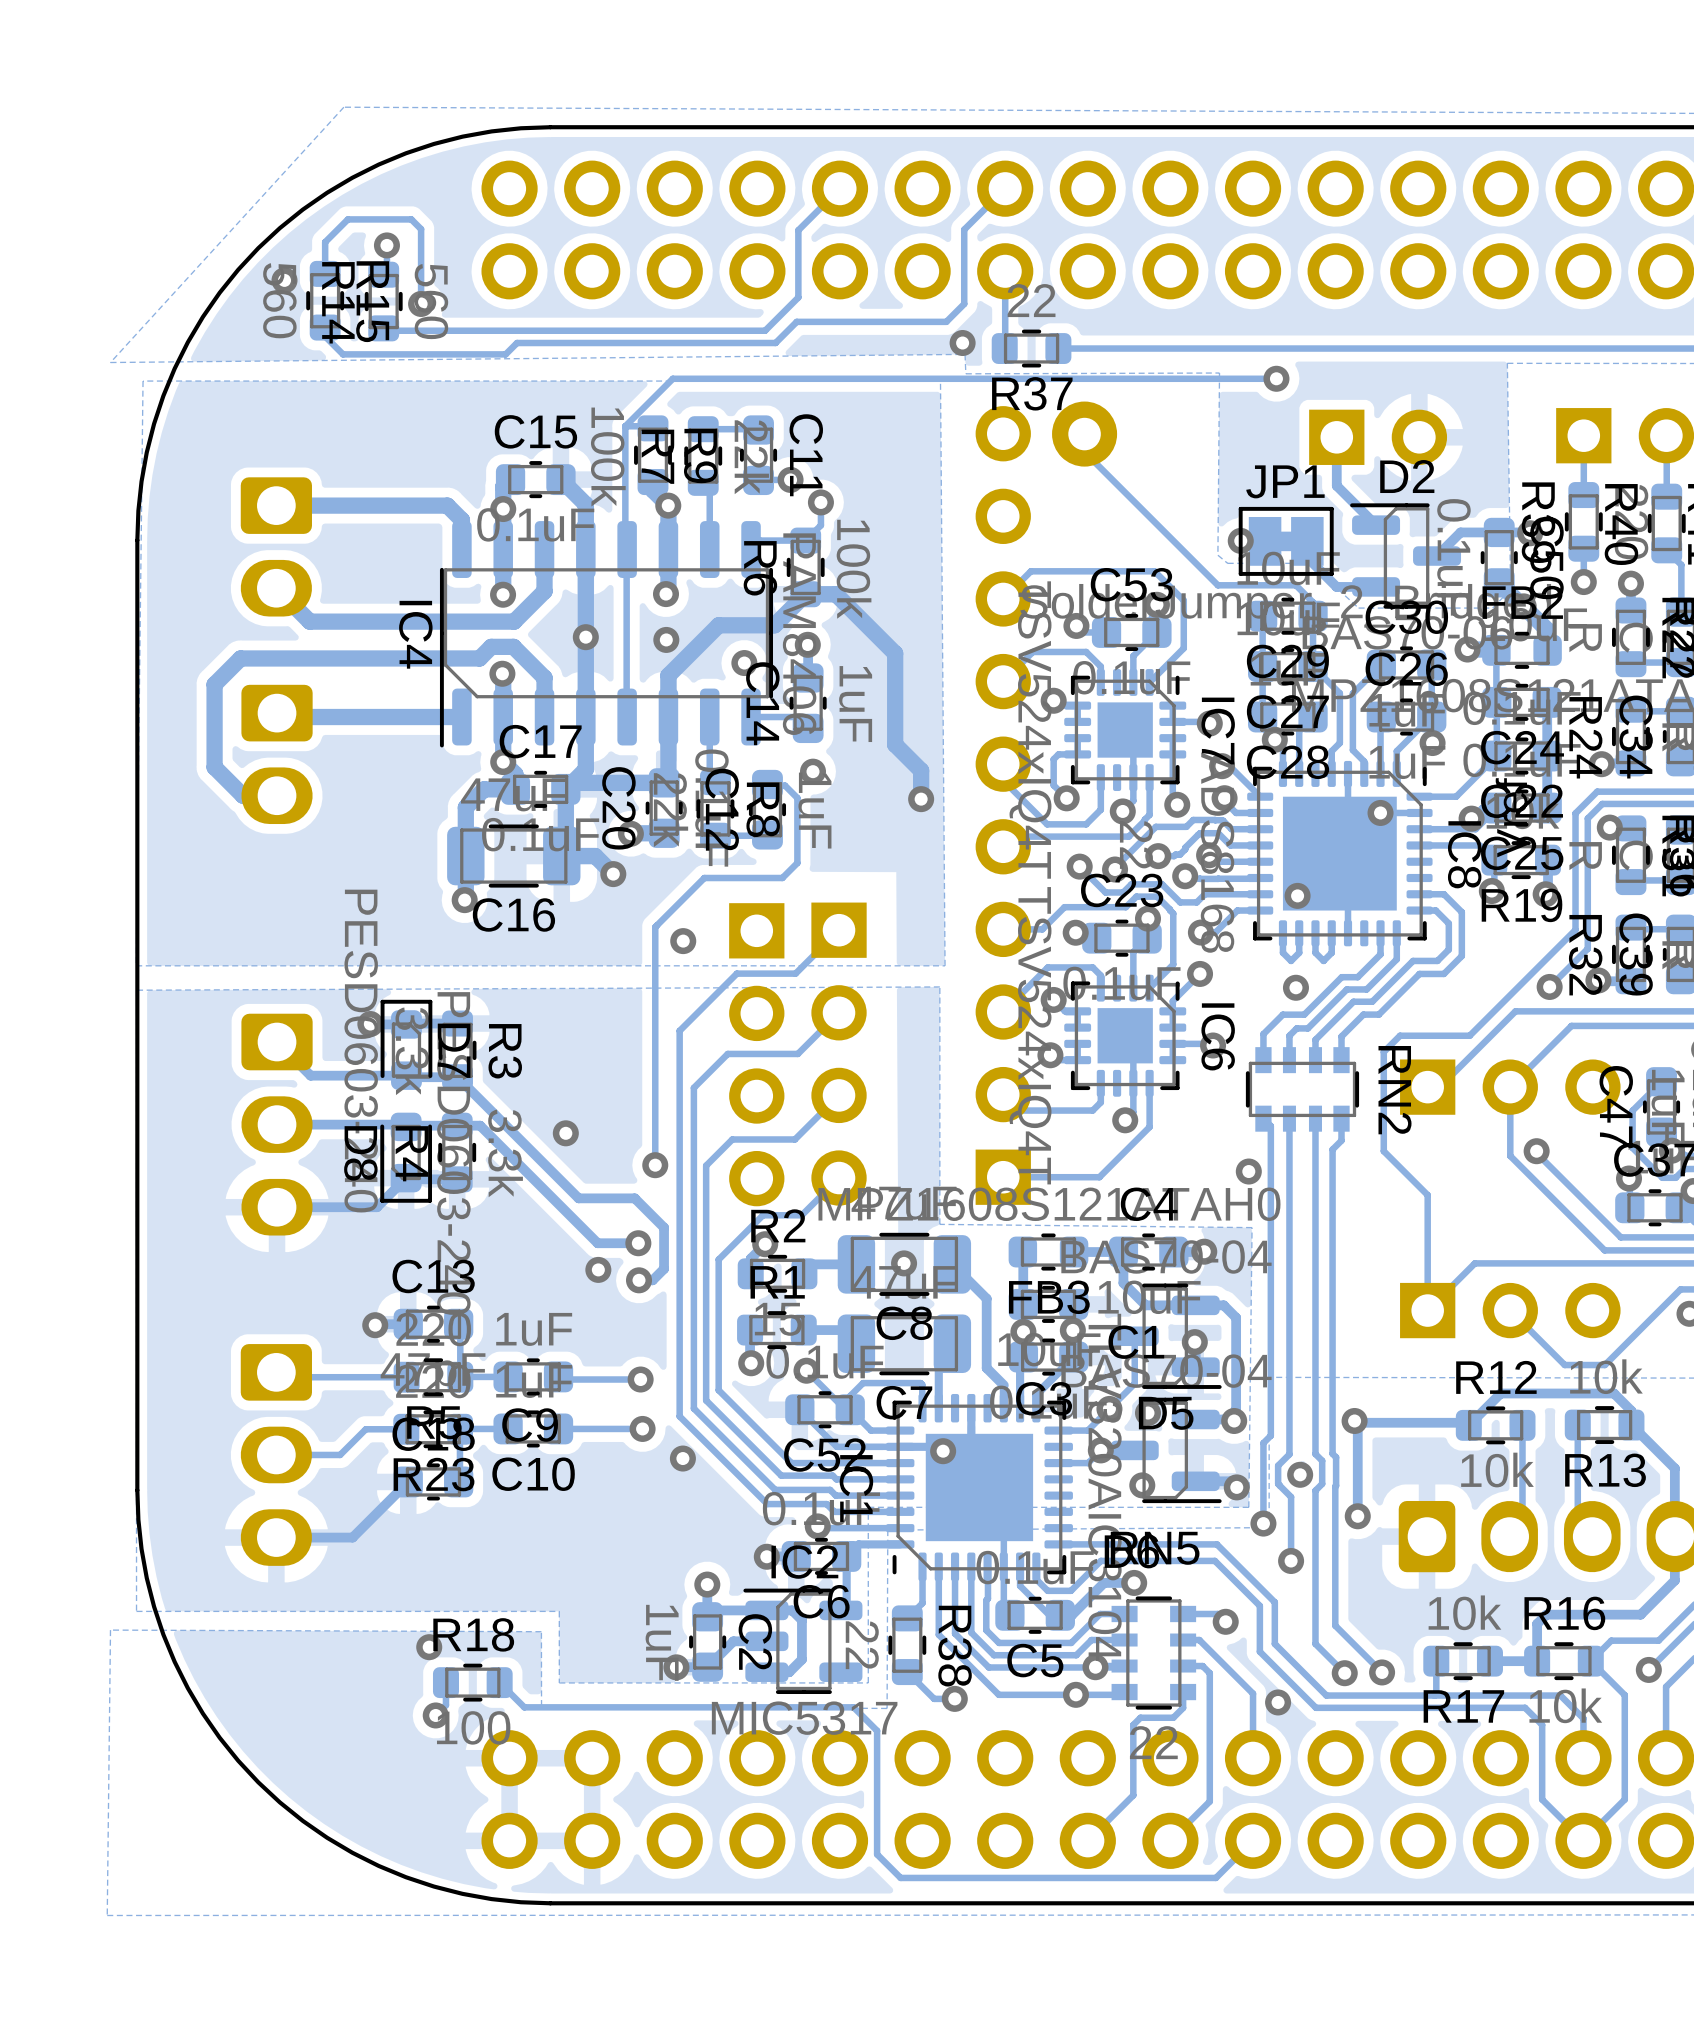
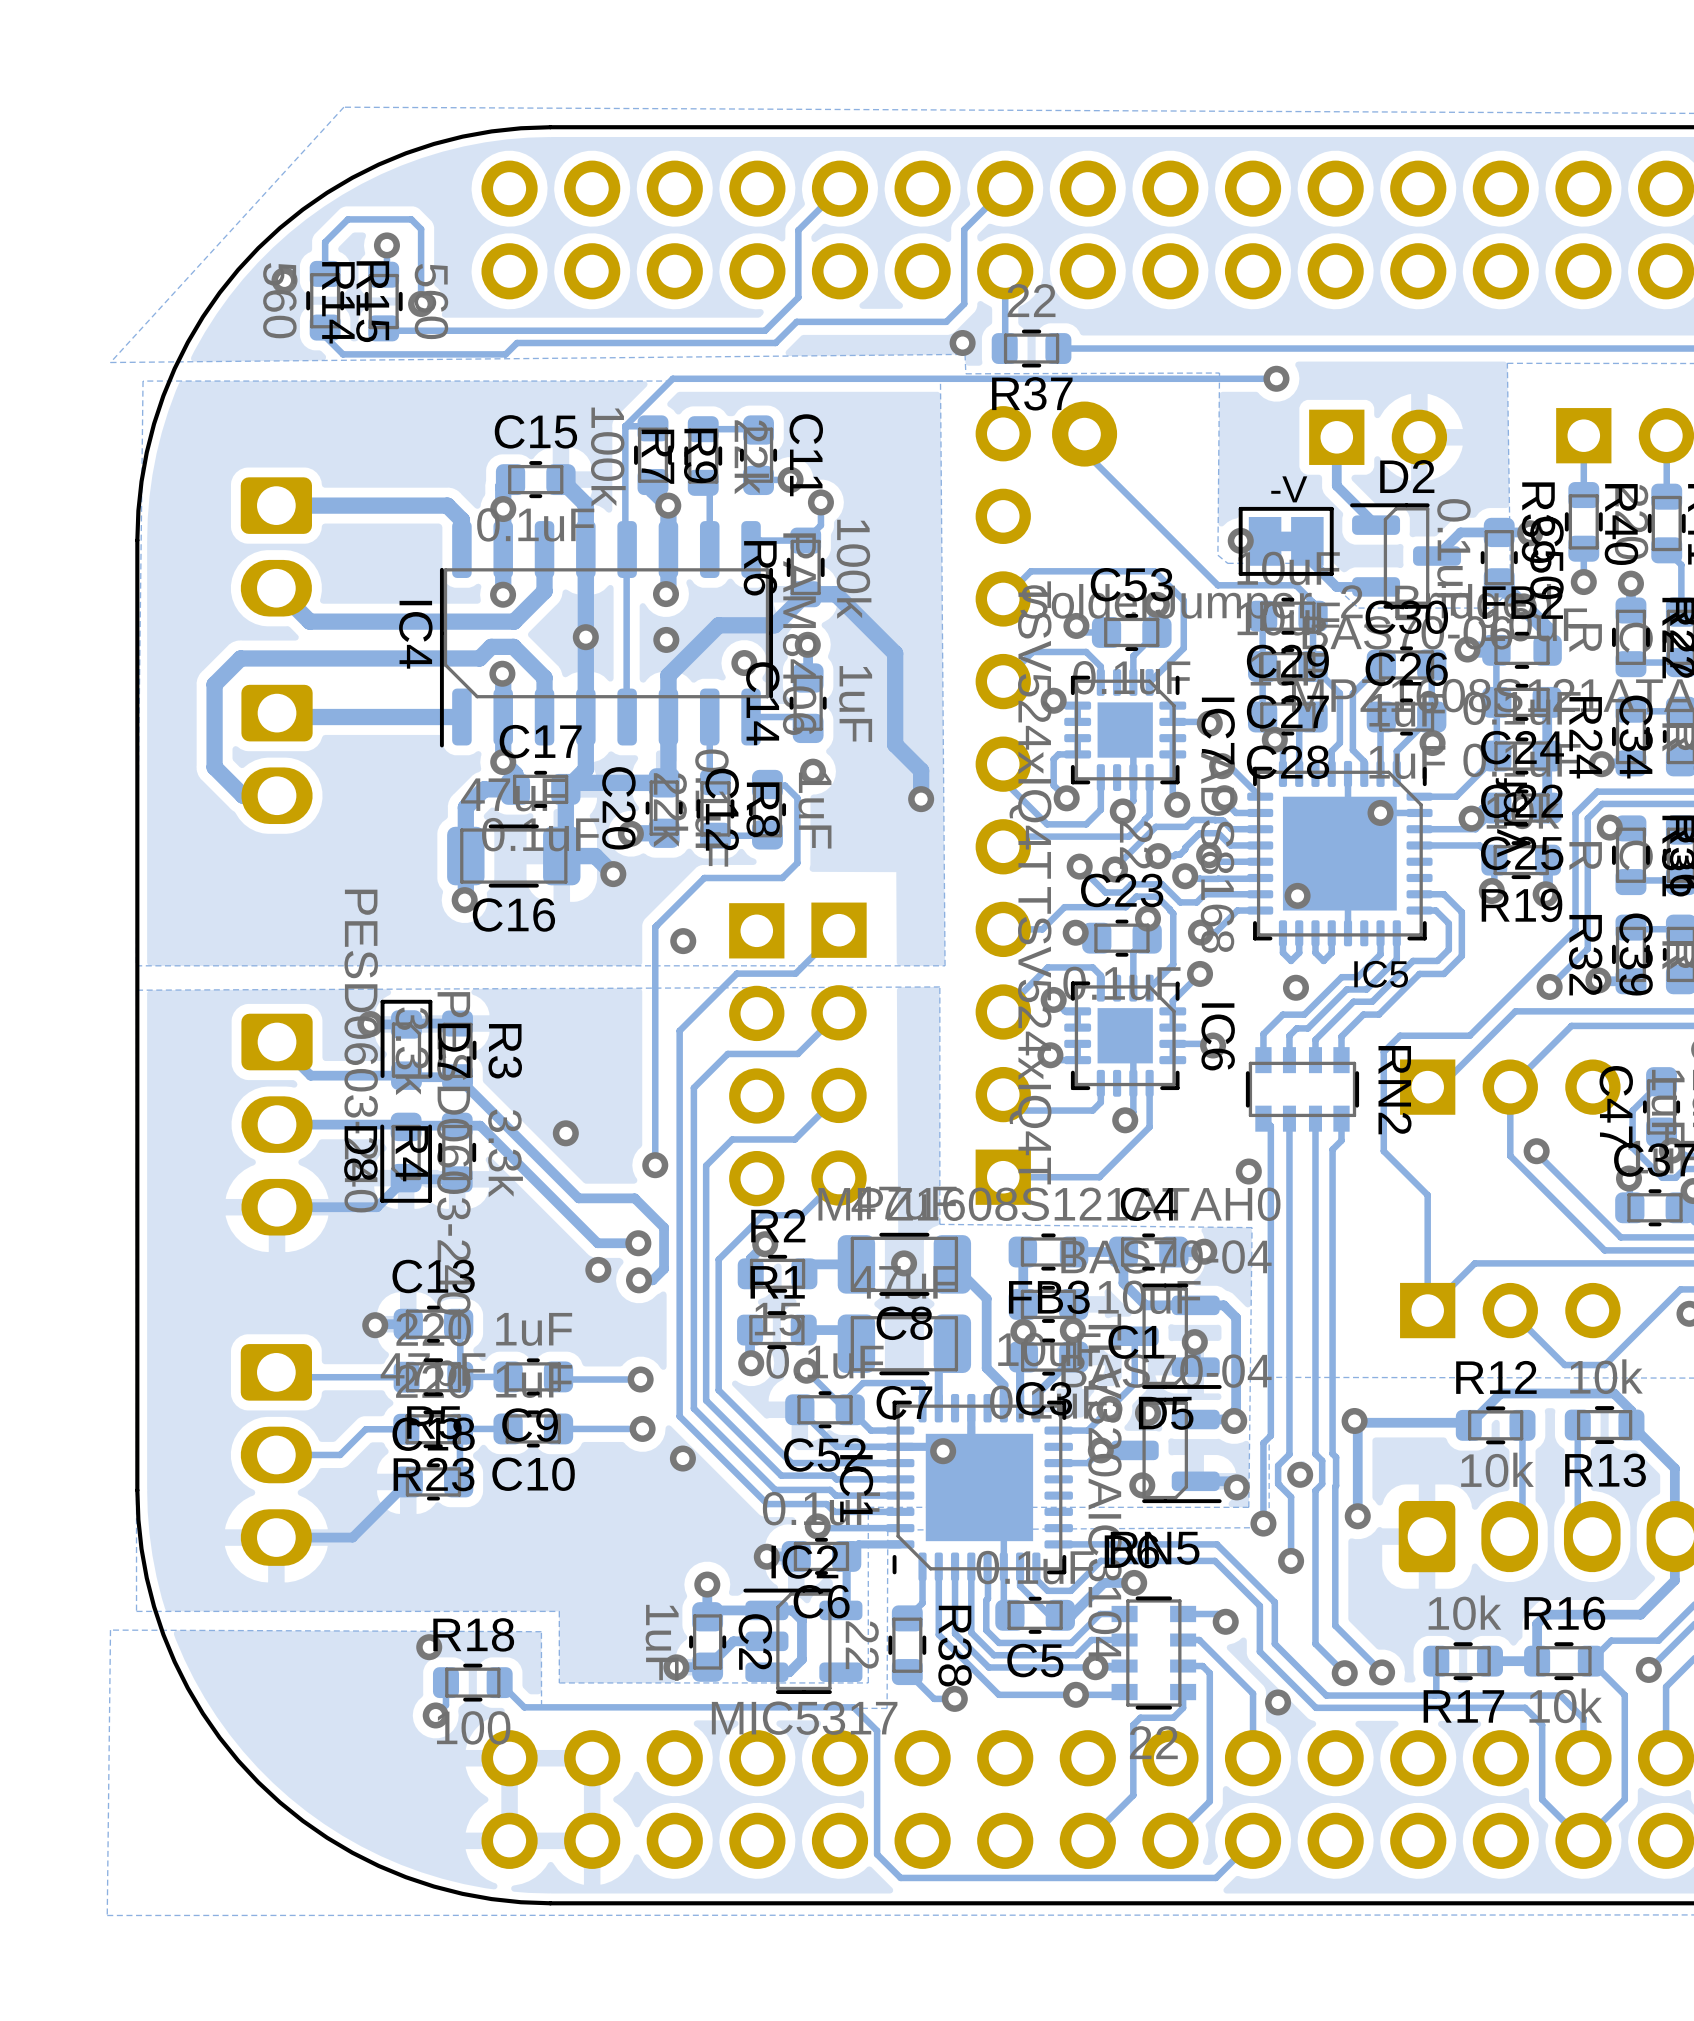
JP1 name: JP1 (1285, 481) -> none
text: none -> -V (1289, 489)
IC8 name: IC8 (1464, 854) -> IC5 (1381, 974)

